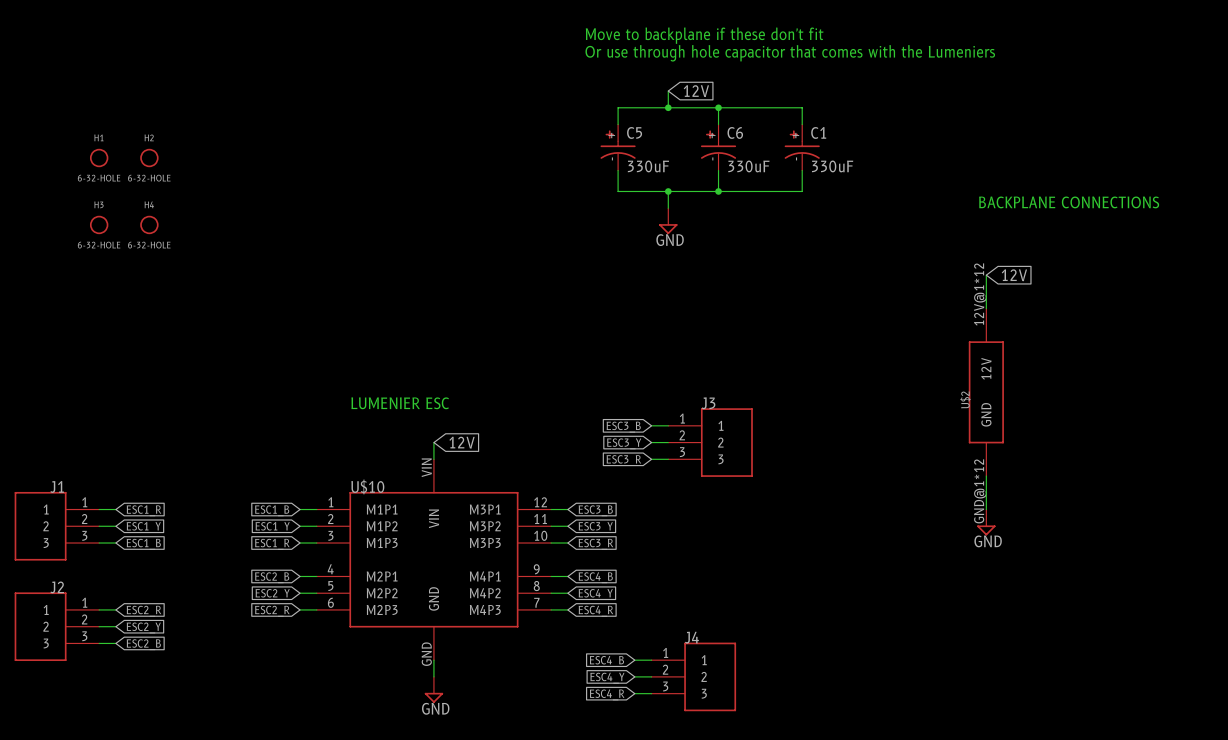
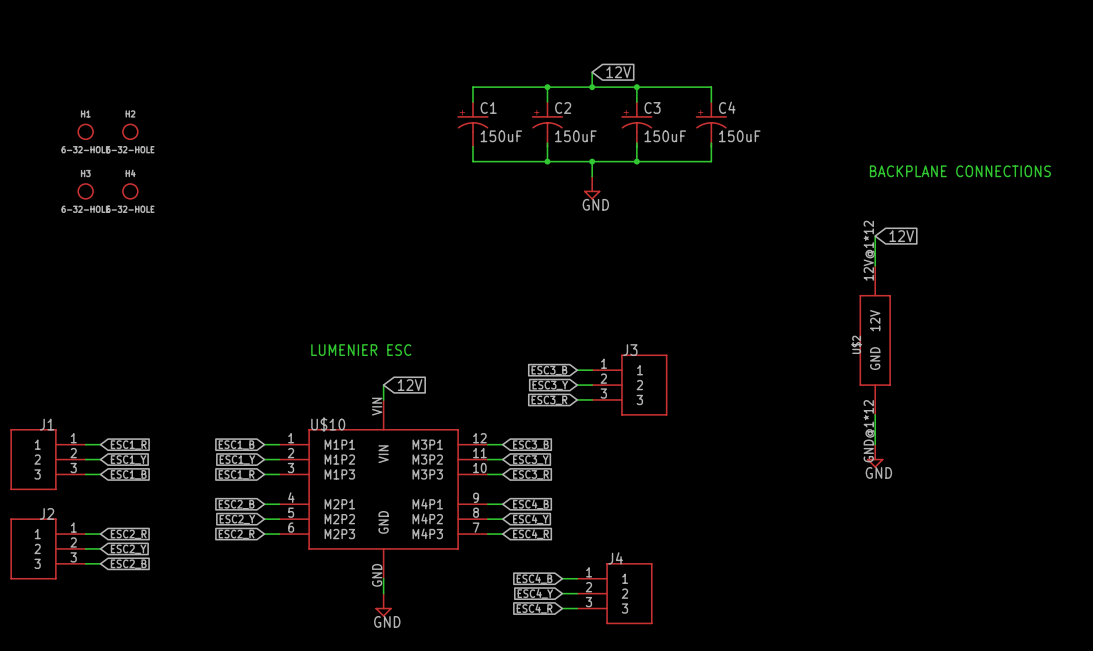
text: Move to backplane if these don't fit (704, 35) -> none
text: Or use through hole capacitor that comes with the Lumeniers (790, 53) -> none
wire: none -> (547, 87) (472, 87) (472, 102)
junction: none -> (547, 87)
C1 symbol: [784, 124, 820, 171] -> [457, 102, 489, 147]
C5: 330uF (618, 147) -> none
C6: 330uF (718, 147) -> none
C2: none -> 150uF (547, 124)
C3: none -> 150uF (636, 124)
C4: none -> 150uF (711, 124)
C1 value: 330uF (832, 166) -> 150uF (501, 136)
wire: none -> (472, 146) (472, 161) (547, 161)
junction: none -> (547, 161)

